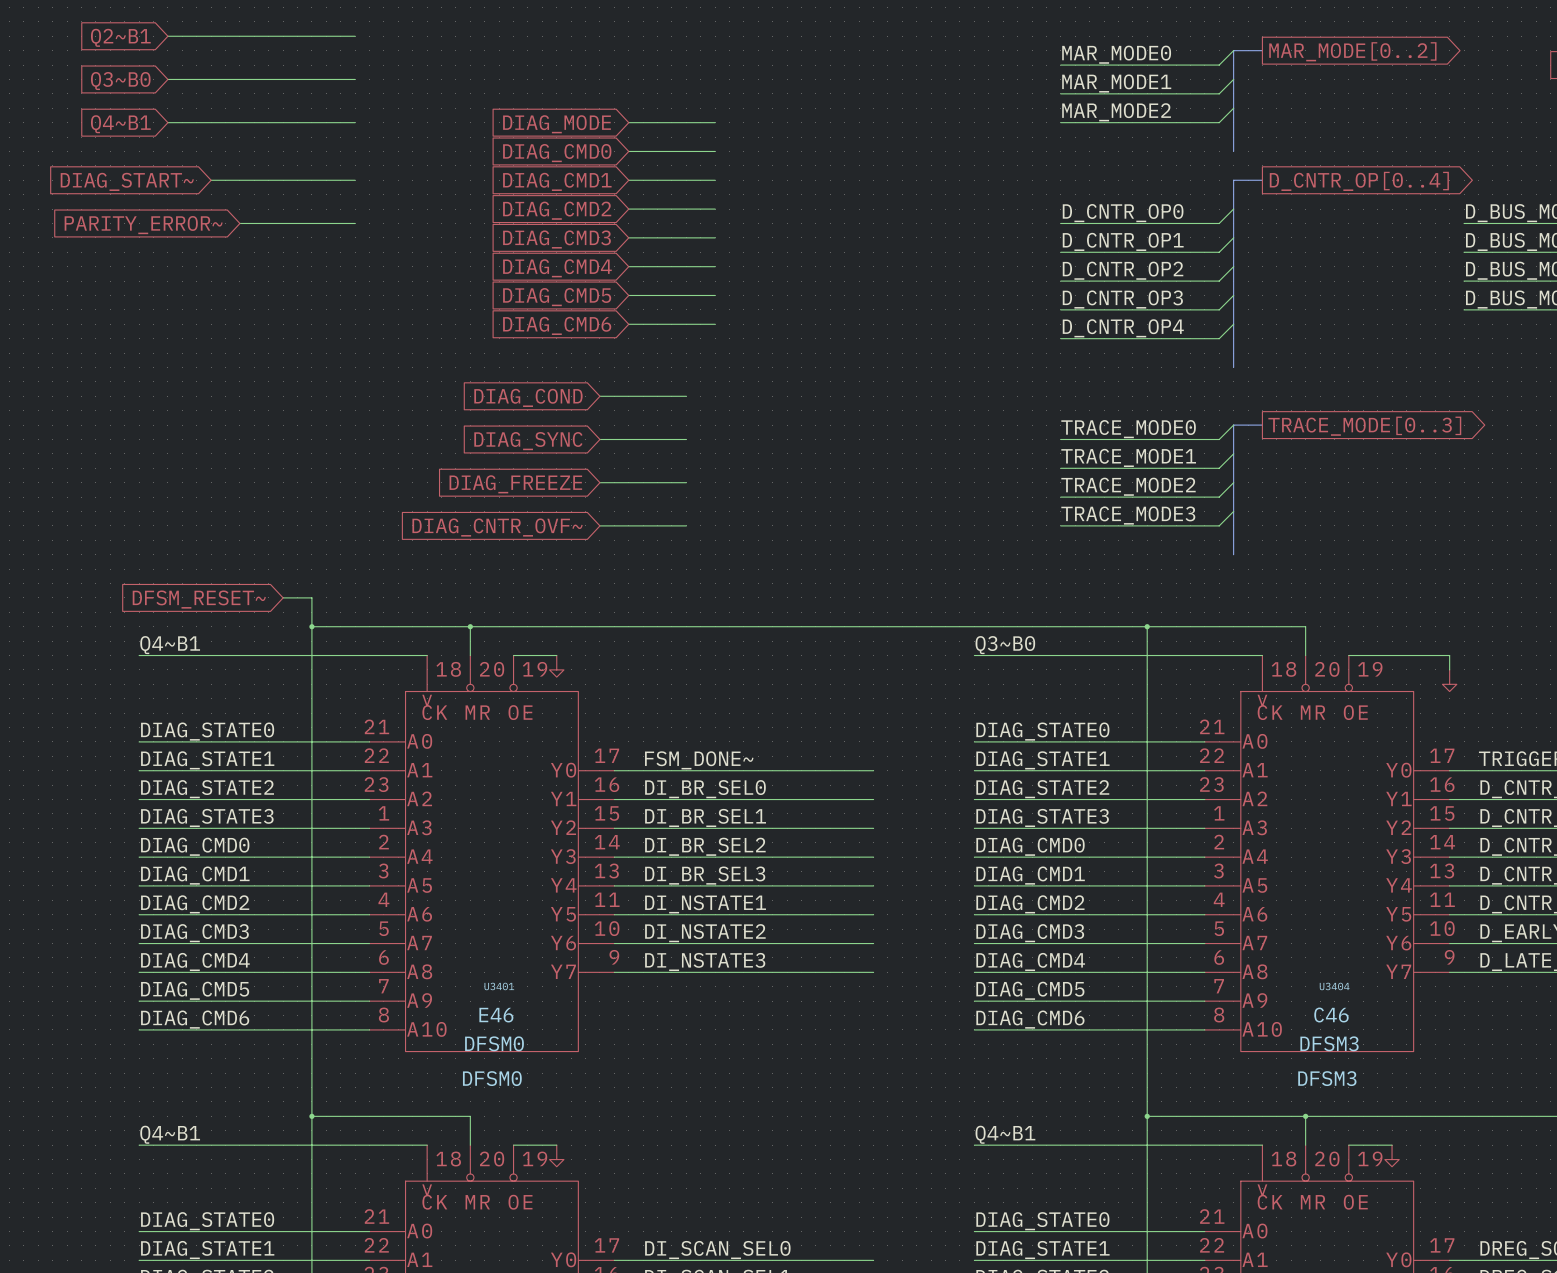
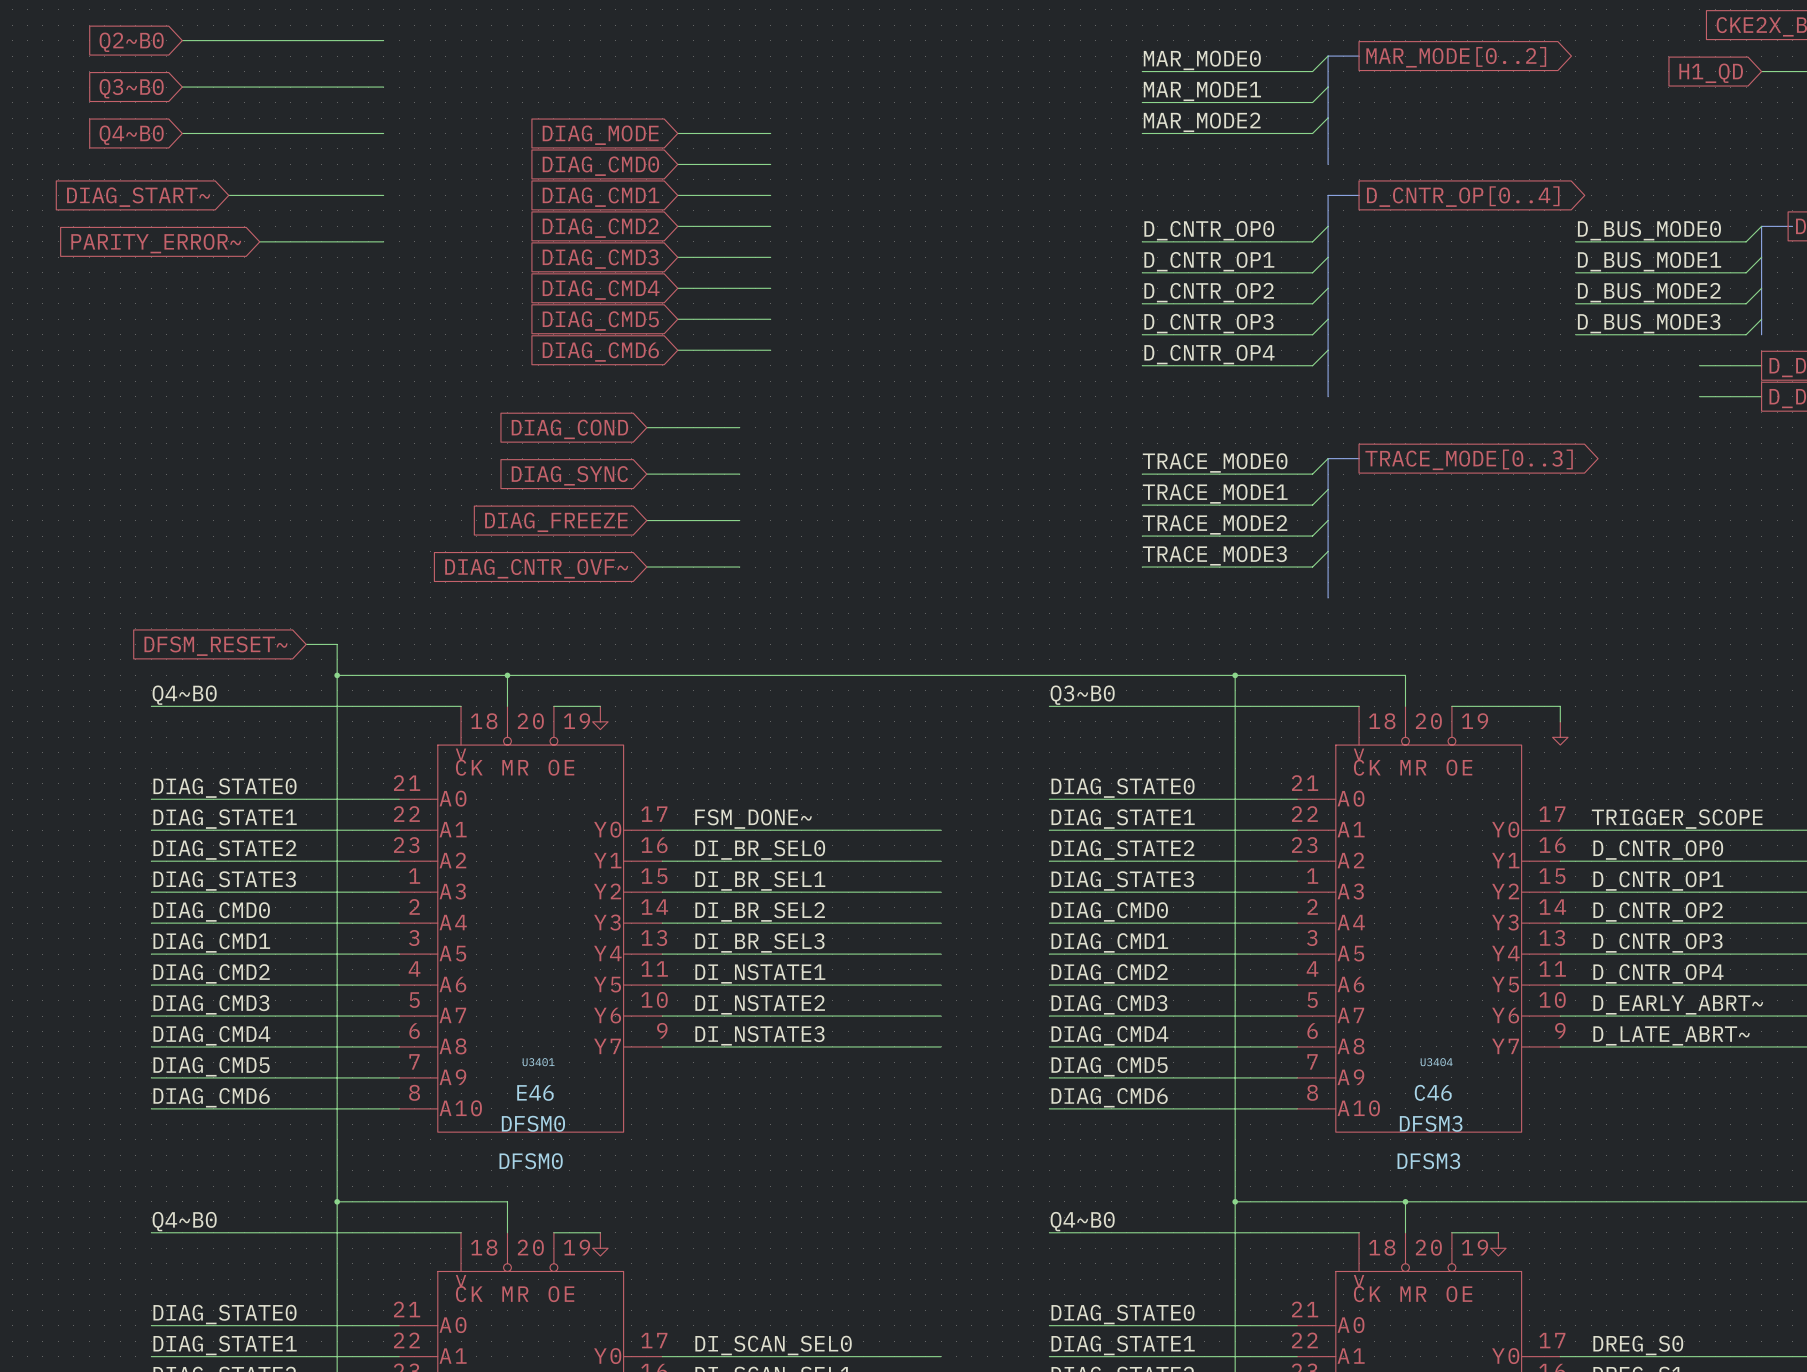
global label: Q2~B1 (120, 37) -> Q2~B0 (131, 42)
global label: Q4~B1 (120, 124) -> Q4~B0 (131, 135)
label: Q4~B1 (170, 645) -> Q4~B0 (184, 695)
label: Q4~B1 (170, 1134) -> Q4~B0 (184, 1221)
label: Q4~B1 (1005, 1134) -> Q4~B0 (1082, 1221)

